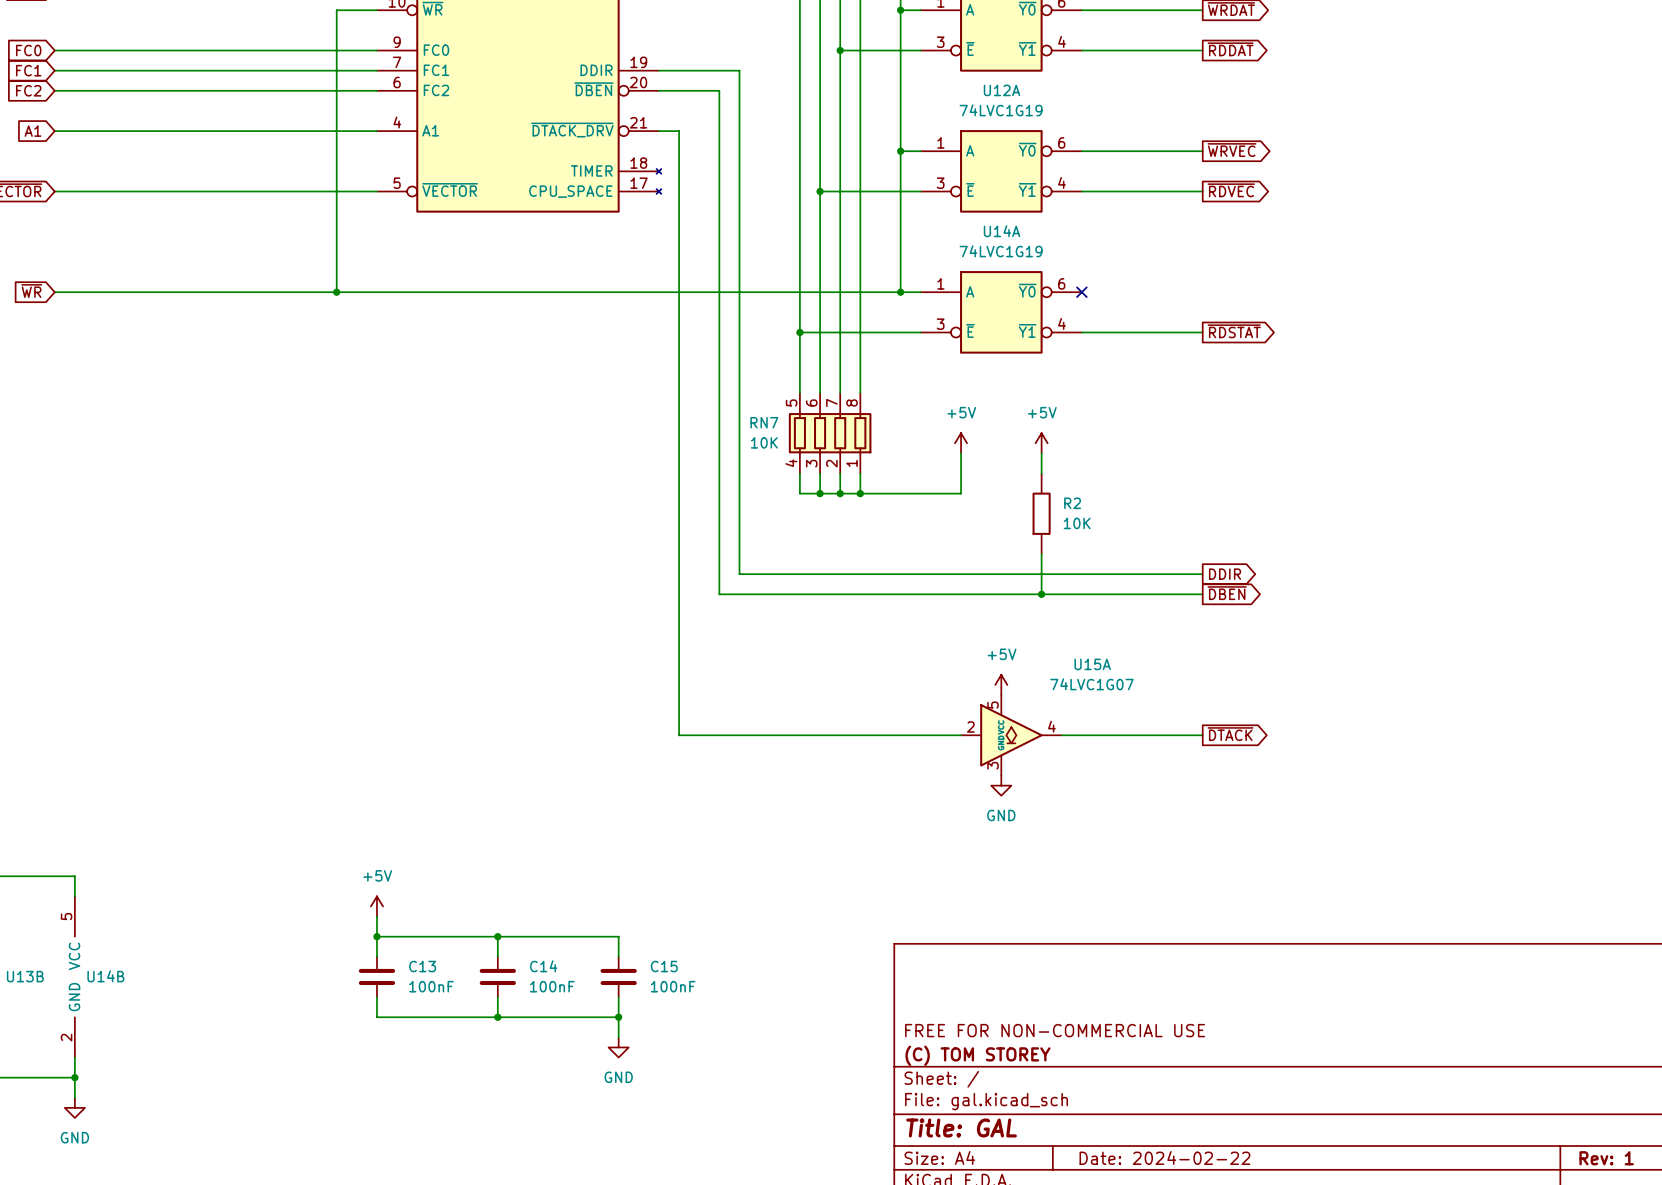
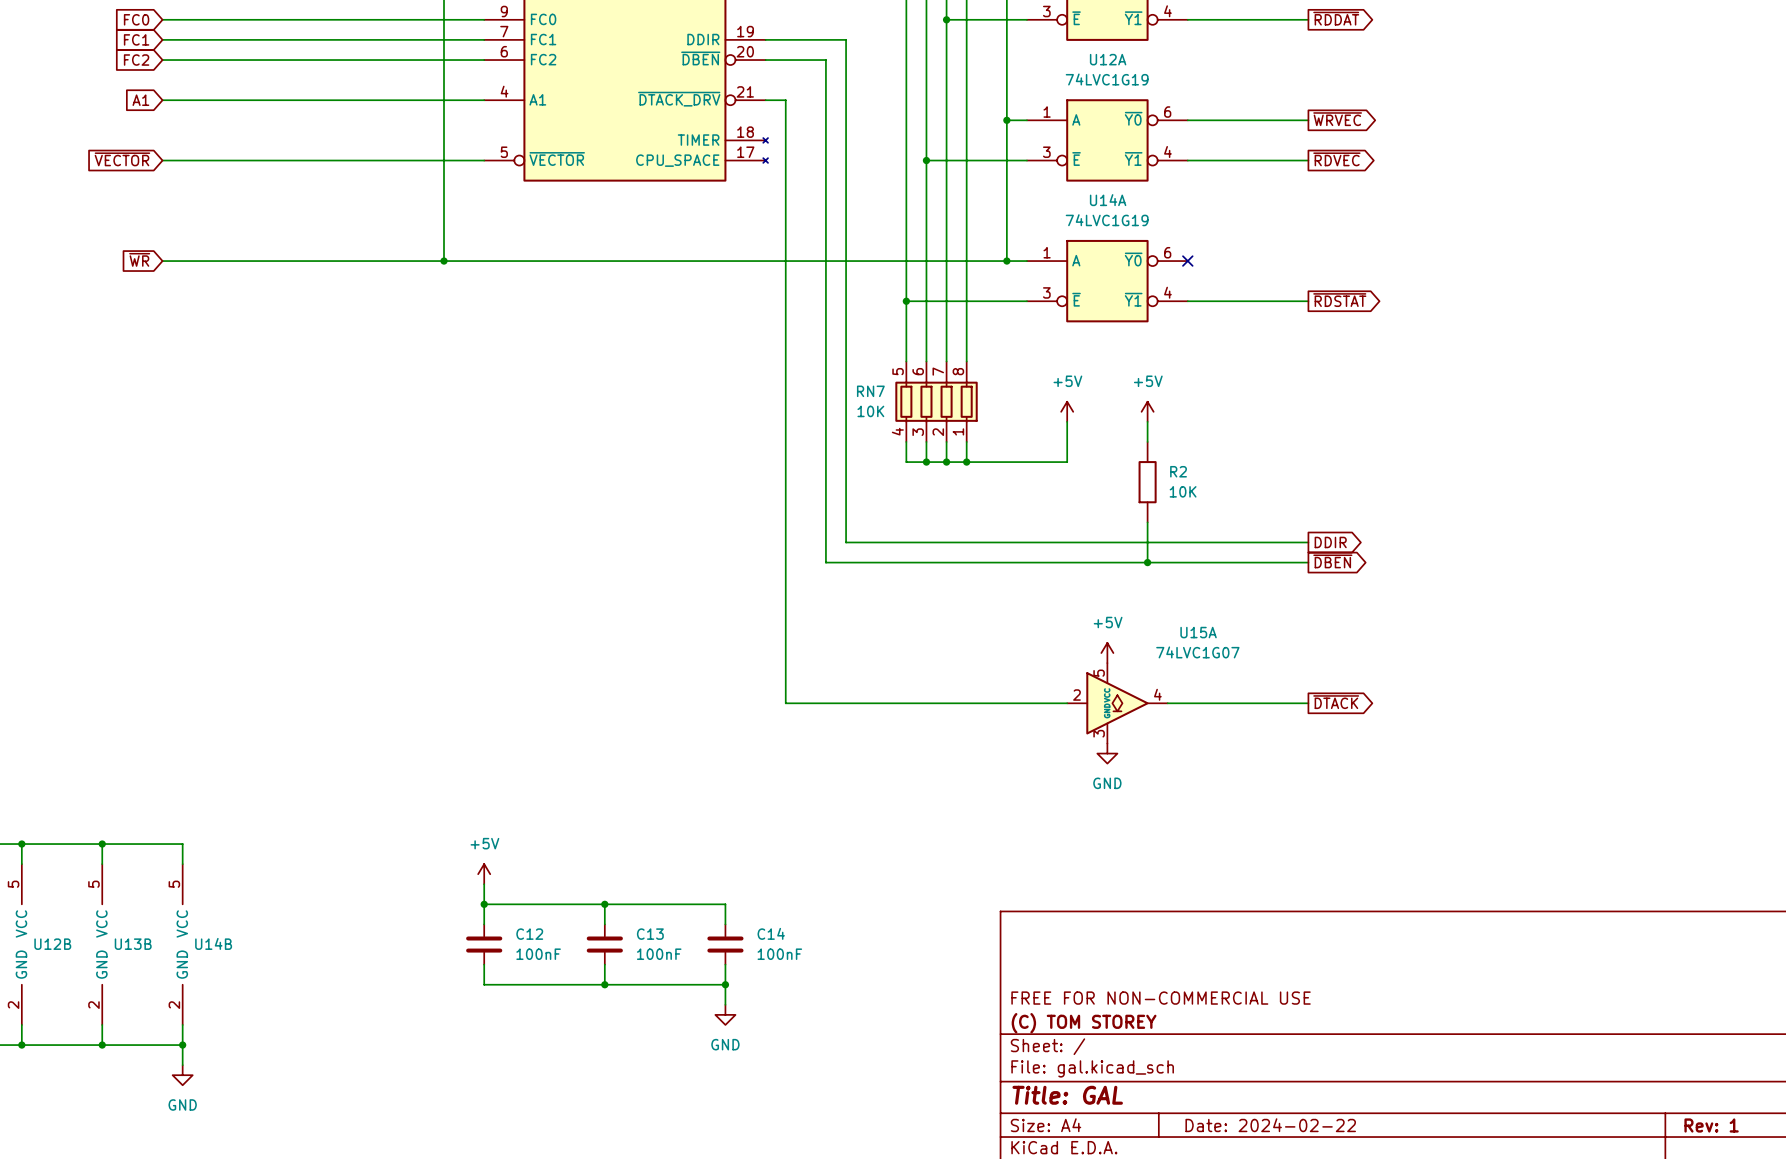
C13 name: C13 (422, 966) -> C12 (529, 934)
C14 name: C14 (543, 966) -> C13 (650, 934)
C15 name: C15 (664, 966) -> C14 (771, 933)

